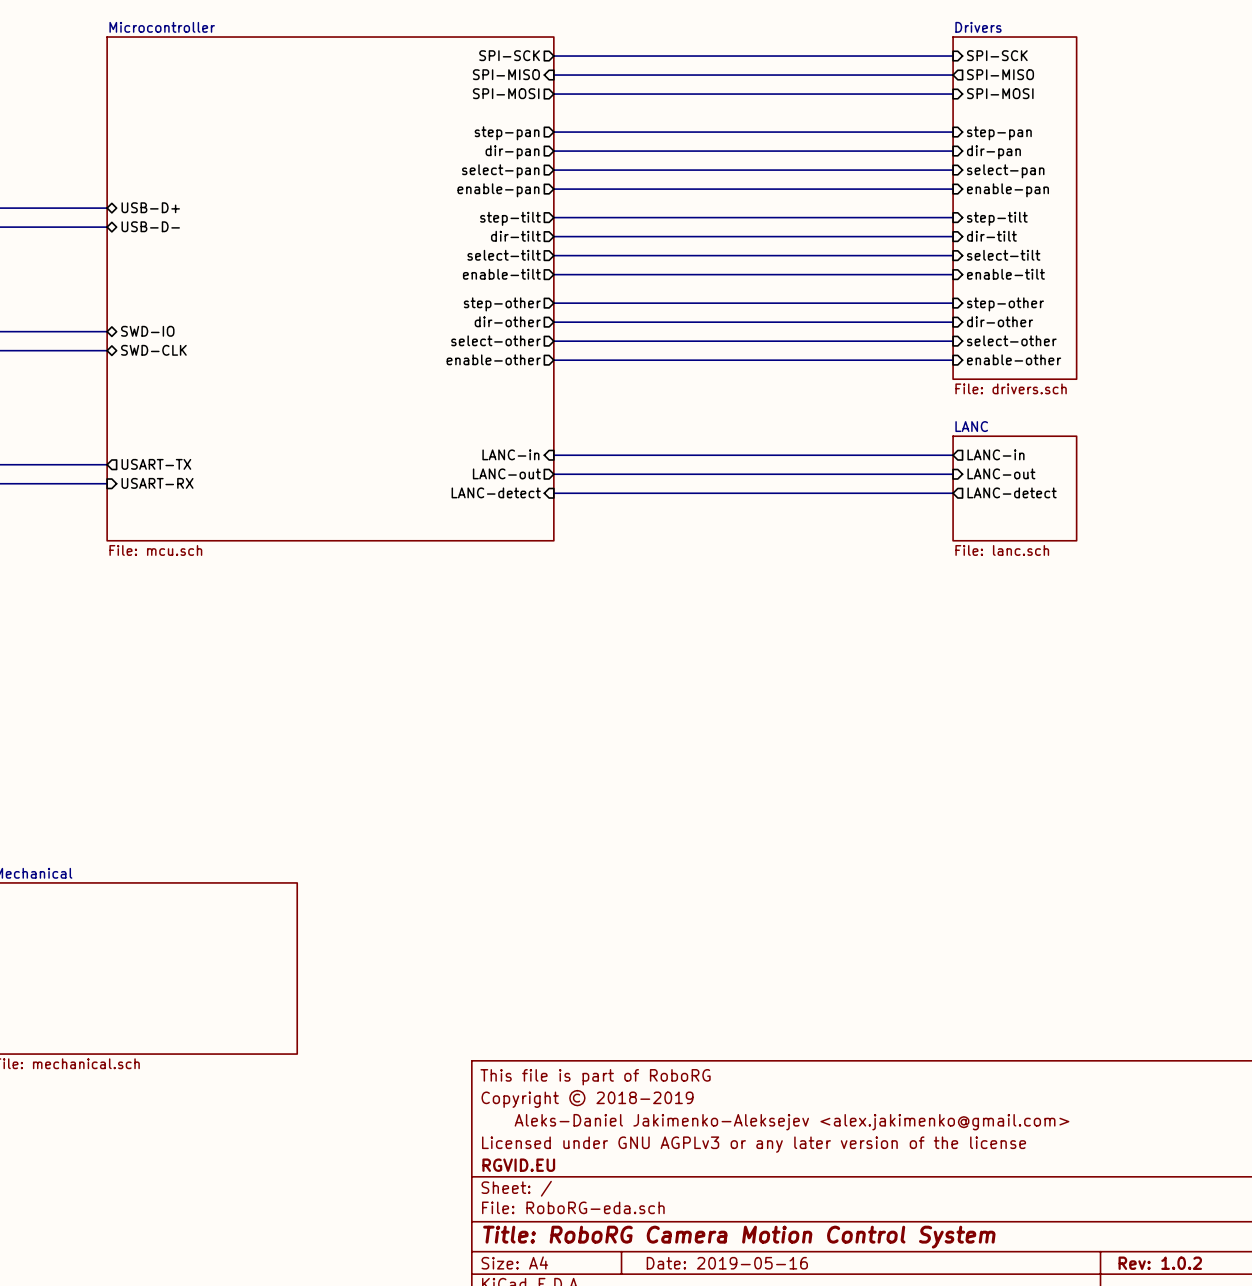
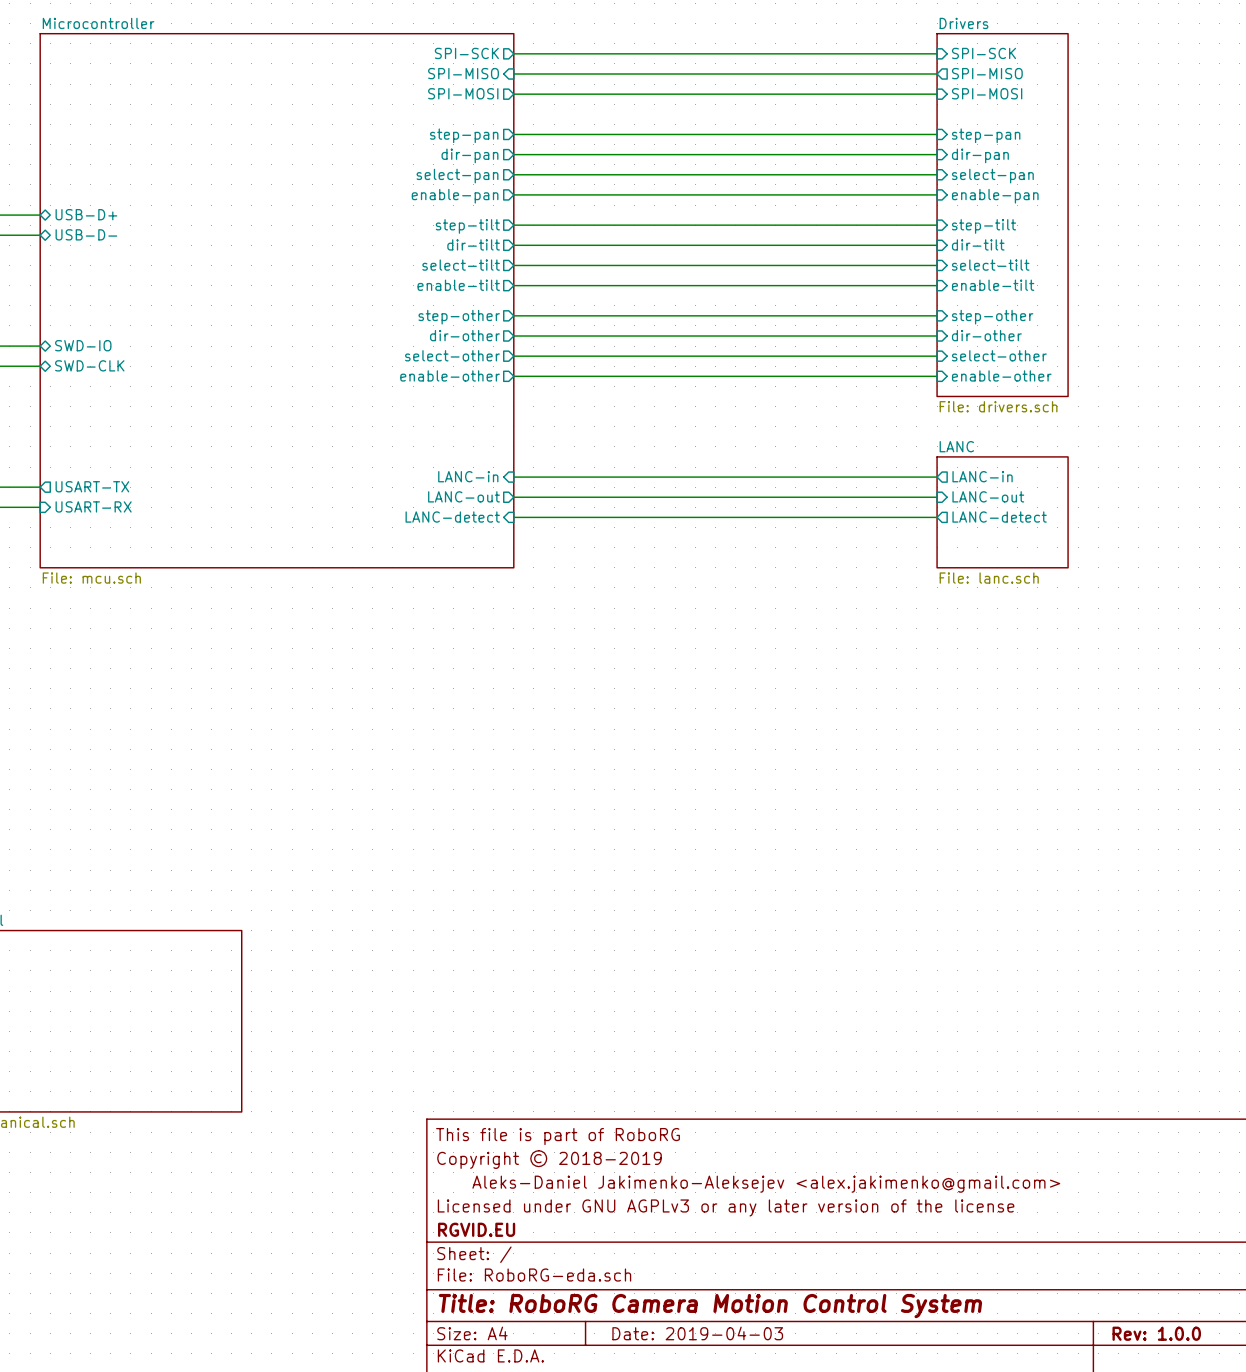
title block: Date: 2019-05-16 (727, 1263) -> Date: 2019-04-03 (697, 1333)
title block: Rev: 1.0.2 (1160, 1263) -> Rev: 1.0.0 (1156, 1333)

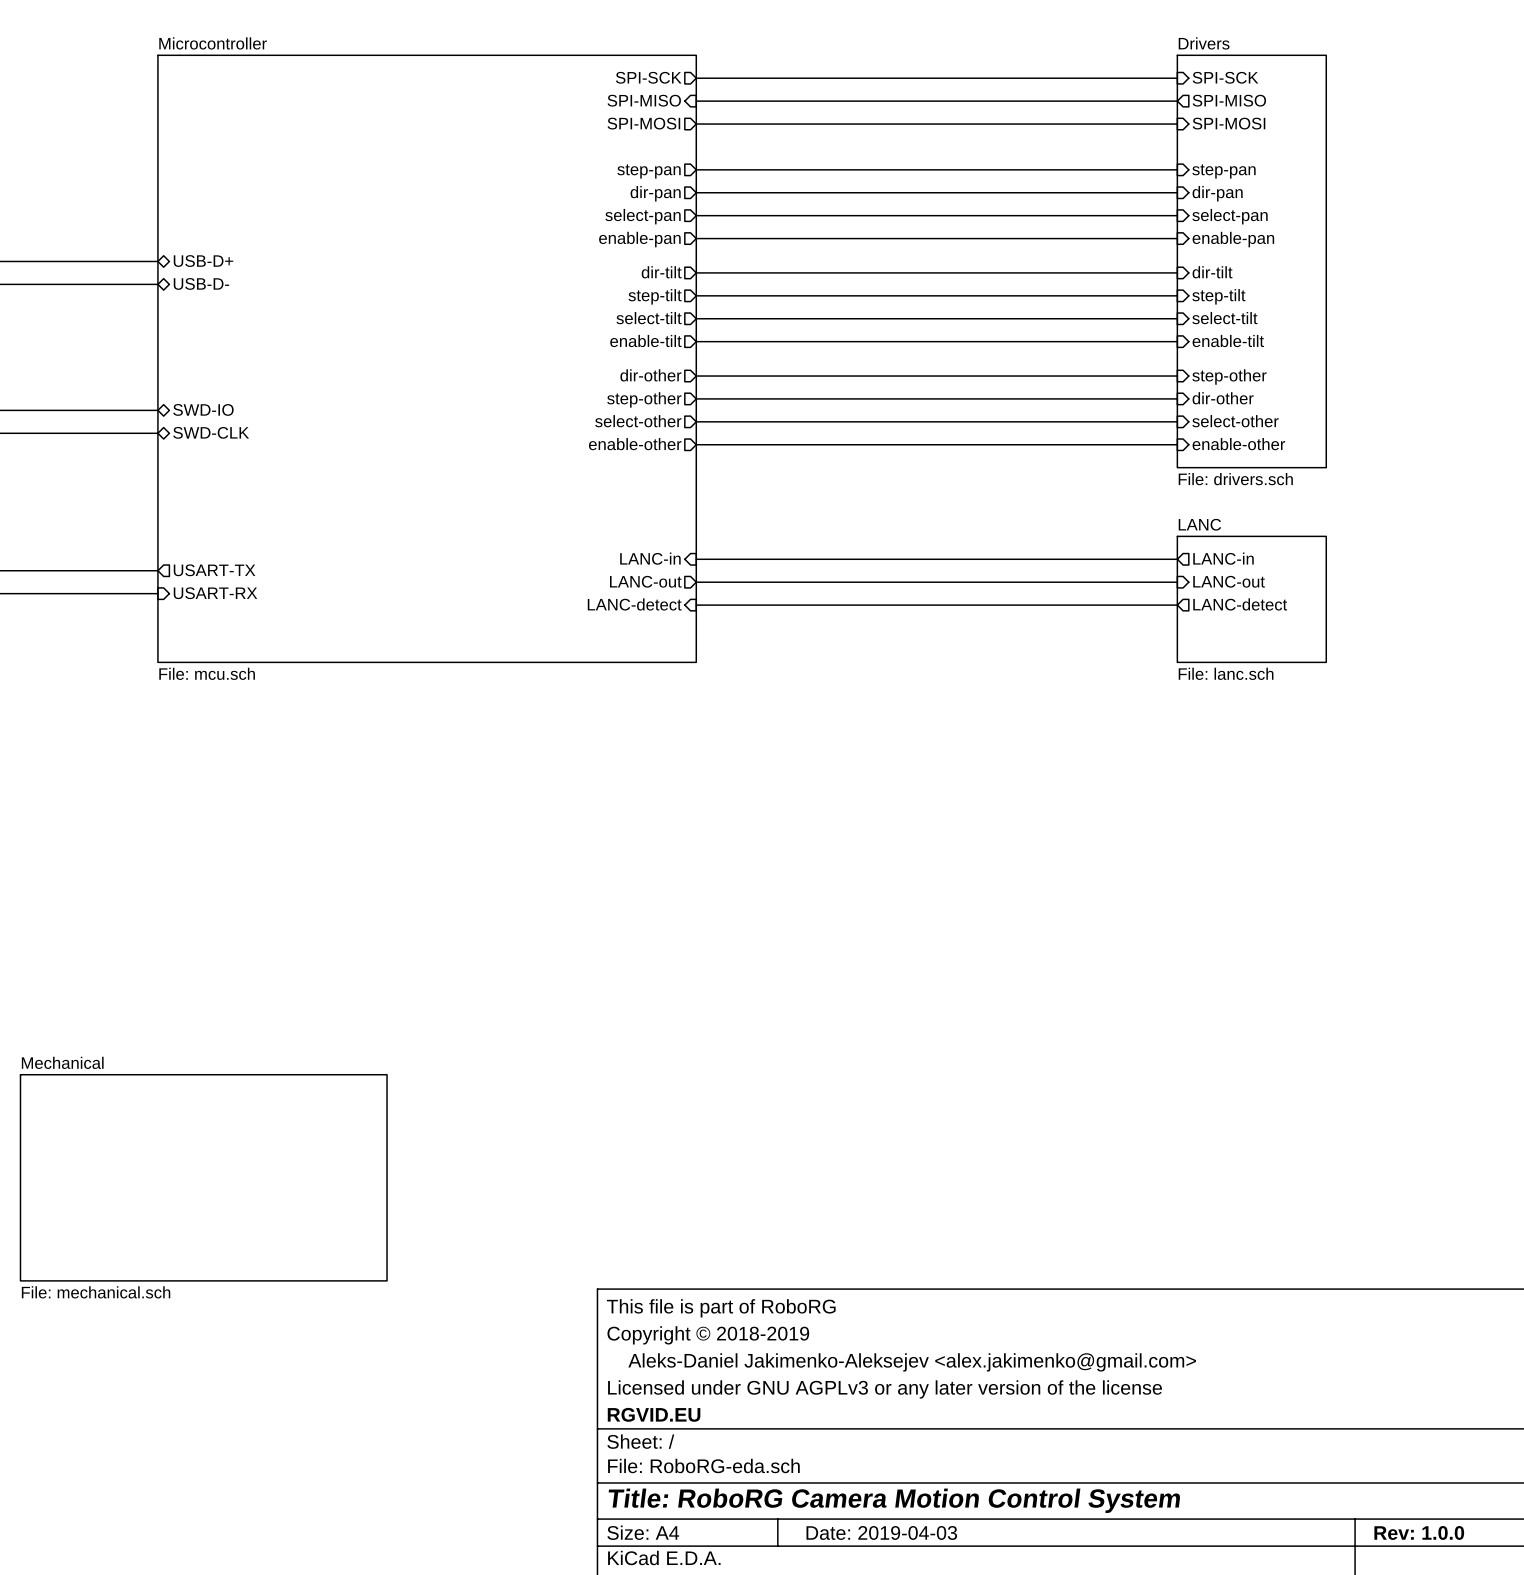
sheet pin: step-tilt (467, 226) -> dir-tilt (661, 272)
sheet pin: step-tilt (984, 226) -> dir-tilt (1212, 272)
sheet pin: dir-tilt (473, 244) -> step-tilt (655, 296)
sheet pin: dir-tilt (978, 244) -> step-tilt (1218, 296)
sheet pin: step-other (459, 317) -> dir-other (650, 375)
sheet pin: dir-other (464, 335) -> step-other (644, 399)

